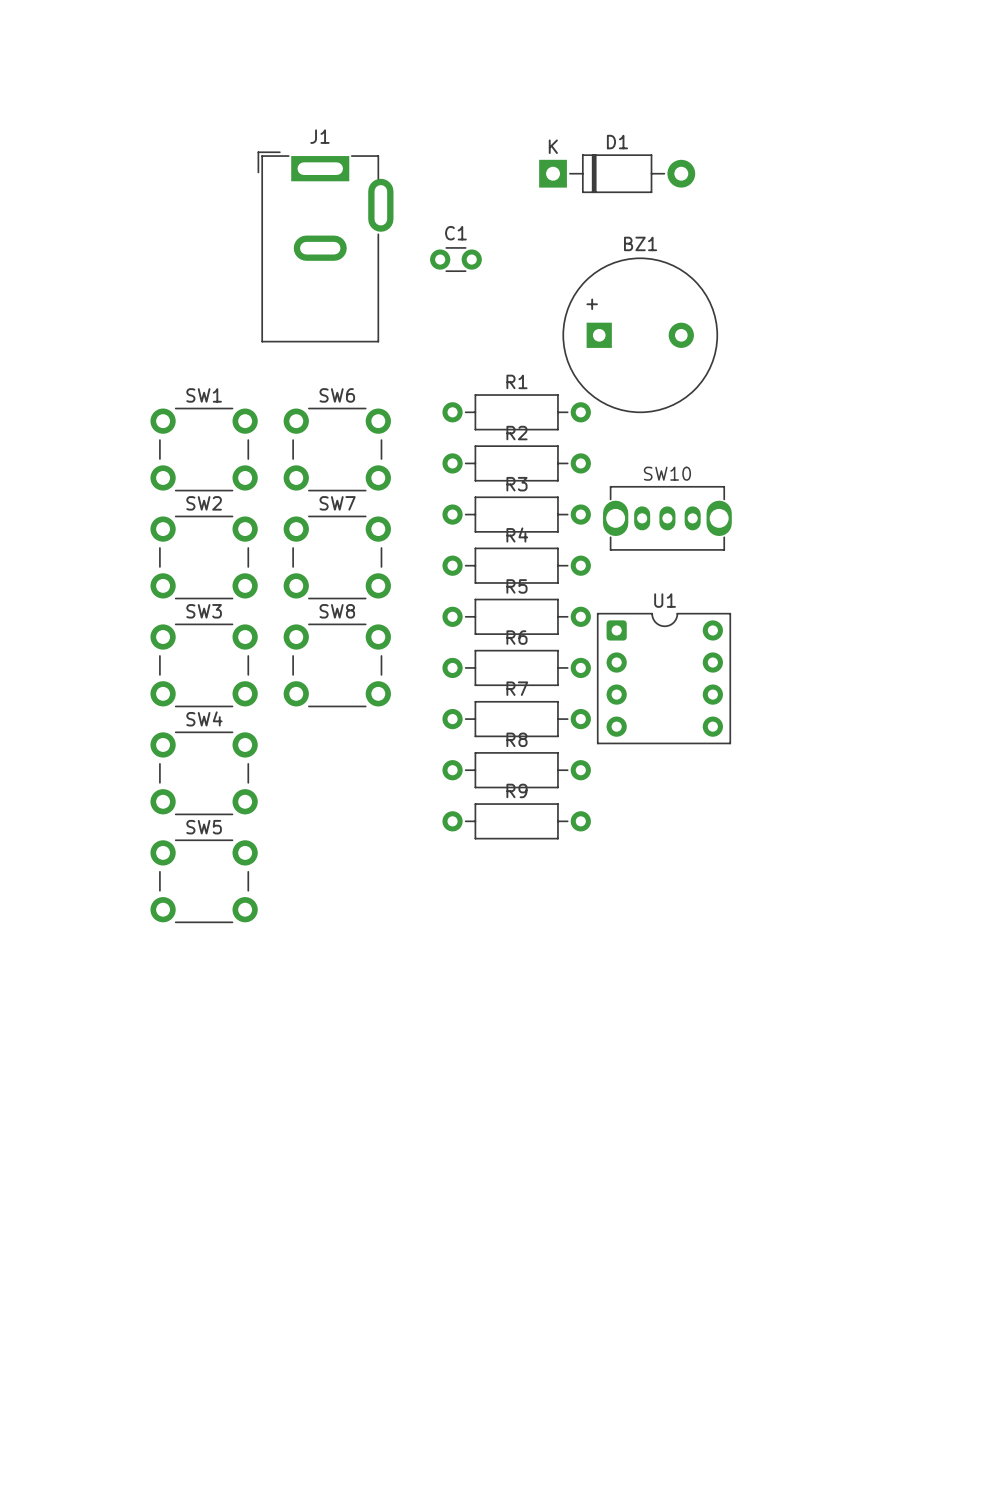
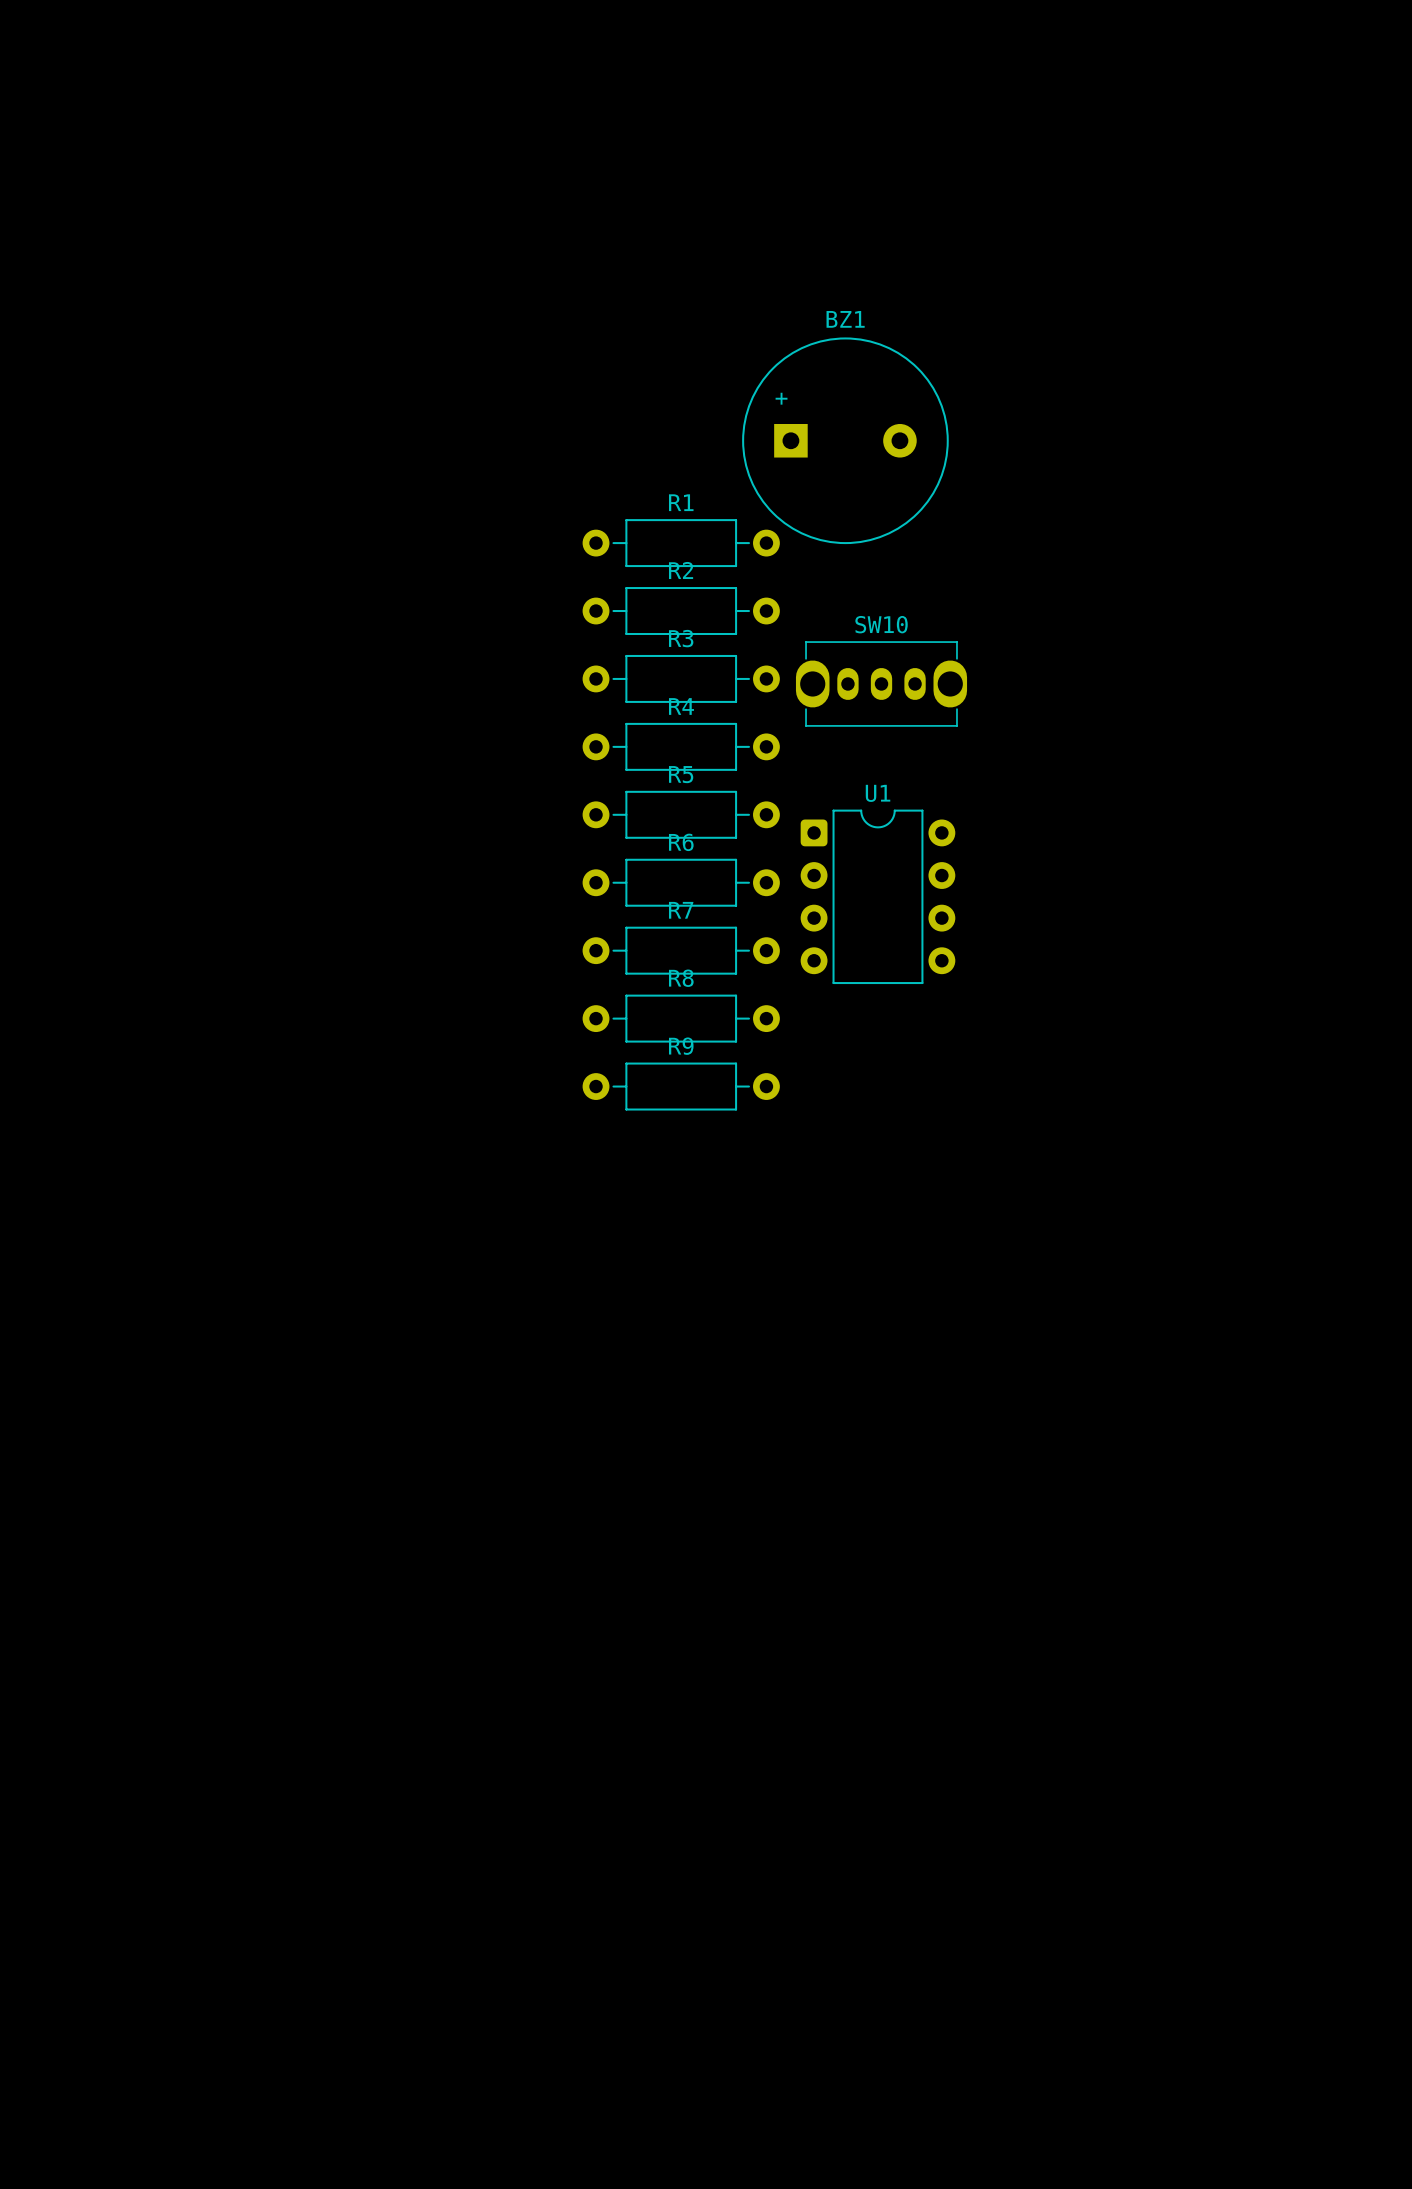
D1: (617, 173) -> none
J1: (325, 246) -> none
C1: (455, 259) -> none
SW1: (204, 449) -> none
SW6: (337, 449) -> none
SW2: (204, 557) -> none
SW7: (337, 557) -> none
U1 footprint: [596, 612, 732, 745] -> [800, 809, 956, 985]
SW3: (204, 665) -> none
SW8: (337, 665) -> none
SW4: (204, 773) -> none
SW5: (204, 881) -> none

